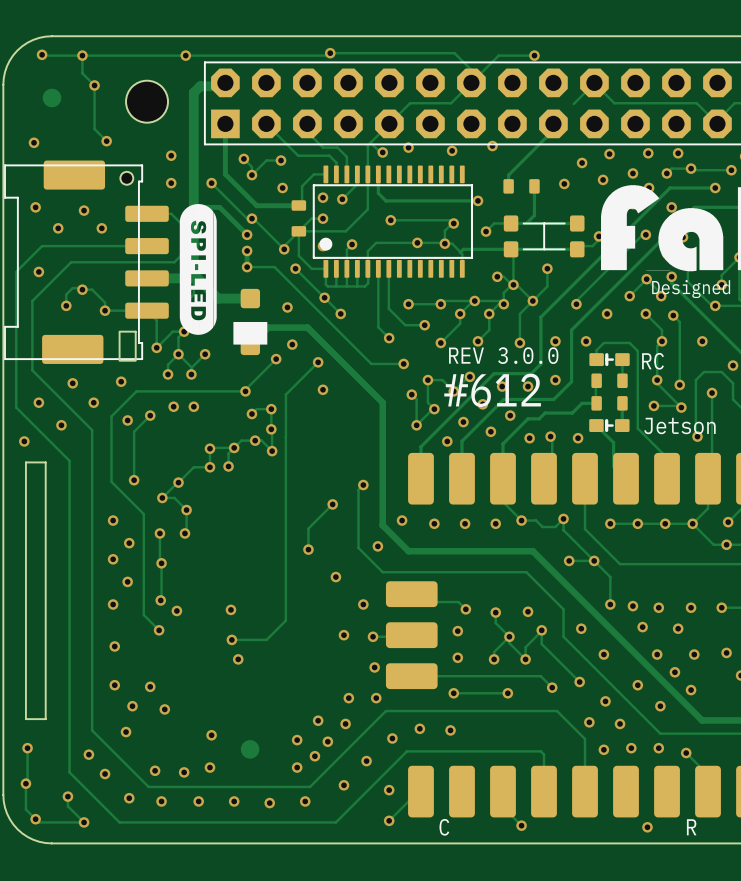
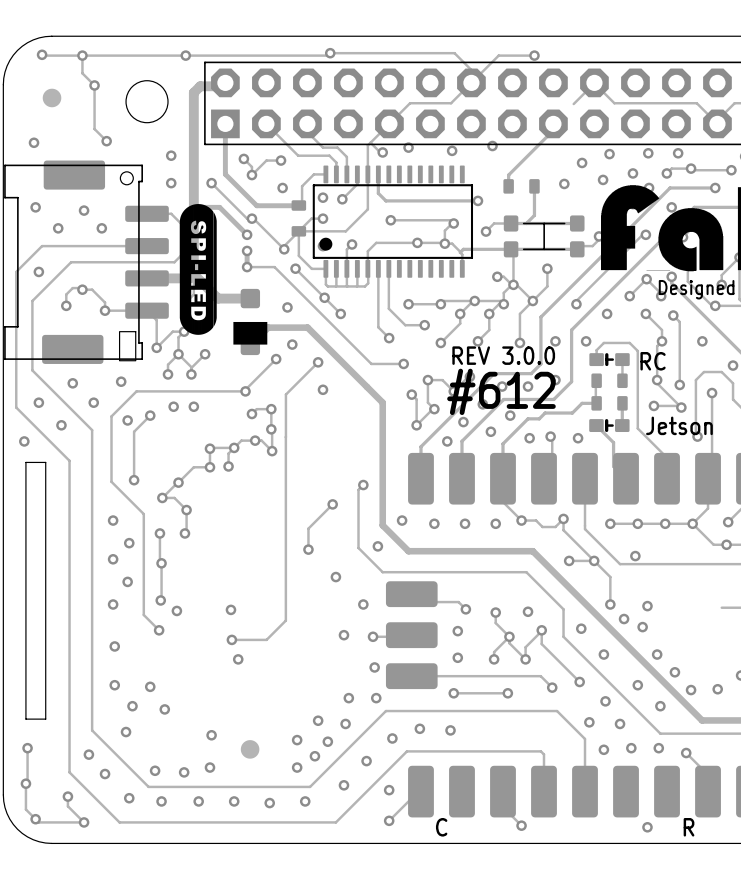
via: none -> (635, 556)
via: (632, 606) -> none
via: none -> (647, 606)
via: (658, 607) -> none
via: (691, 607) -> none
via: (721, 607) -> none
via: none -> (624, 619)
via: (678, 628) -> none
via: (726, 652) -> none
via: (694, 654) -> none
via: none -> (717, 689)

